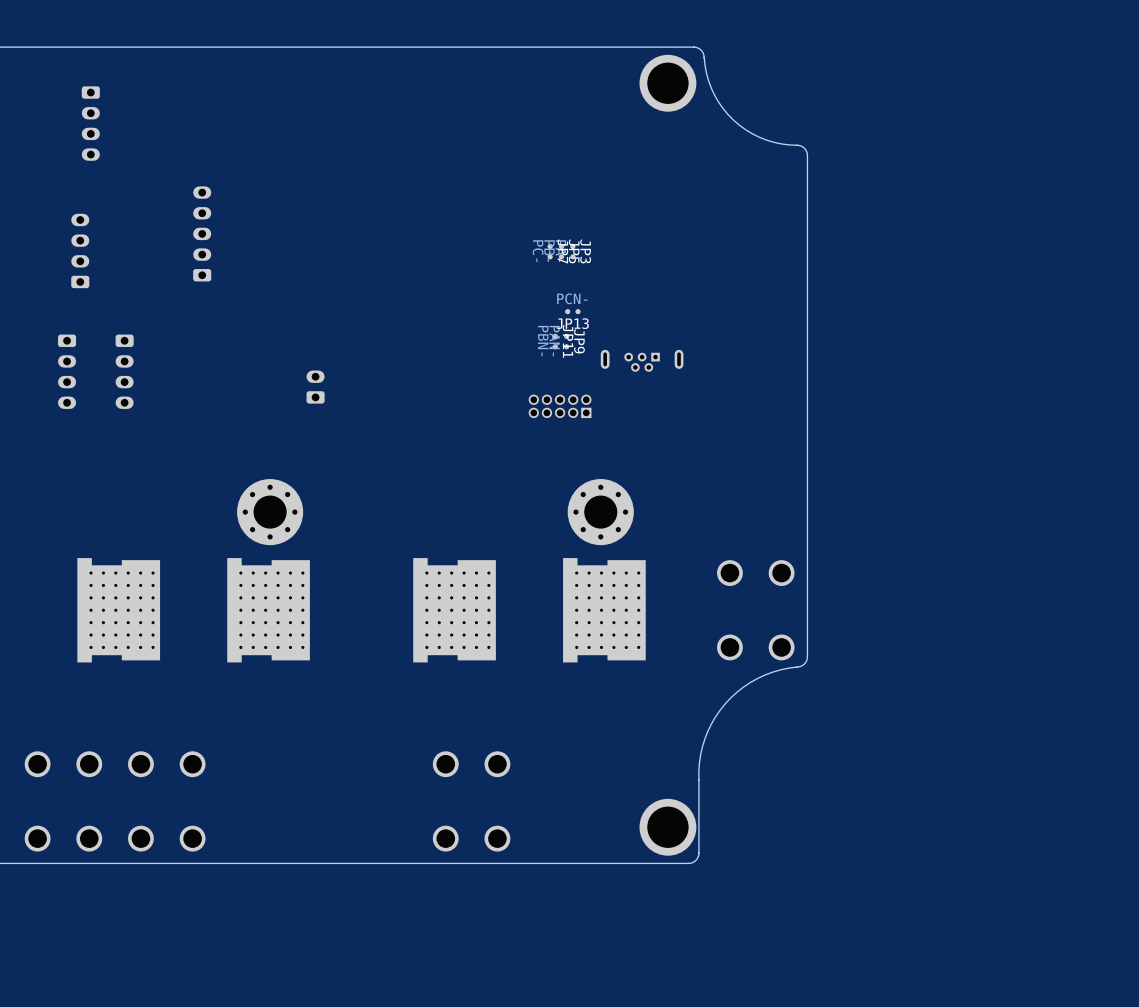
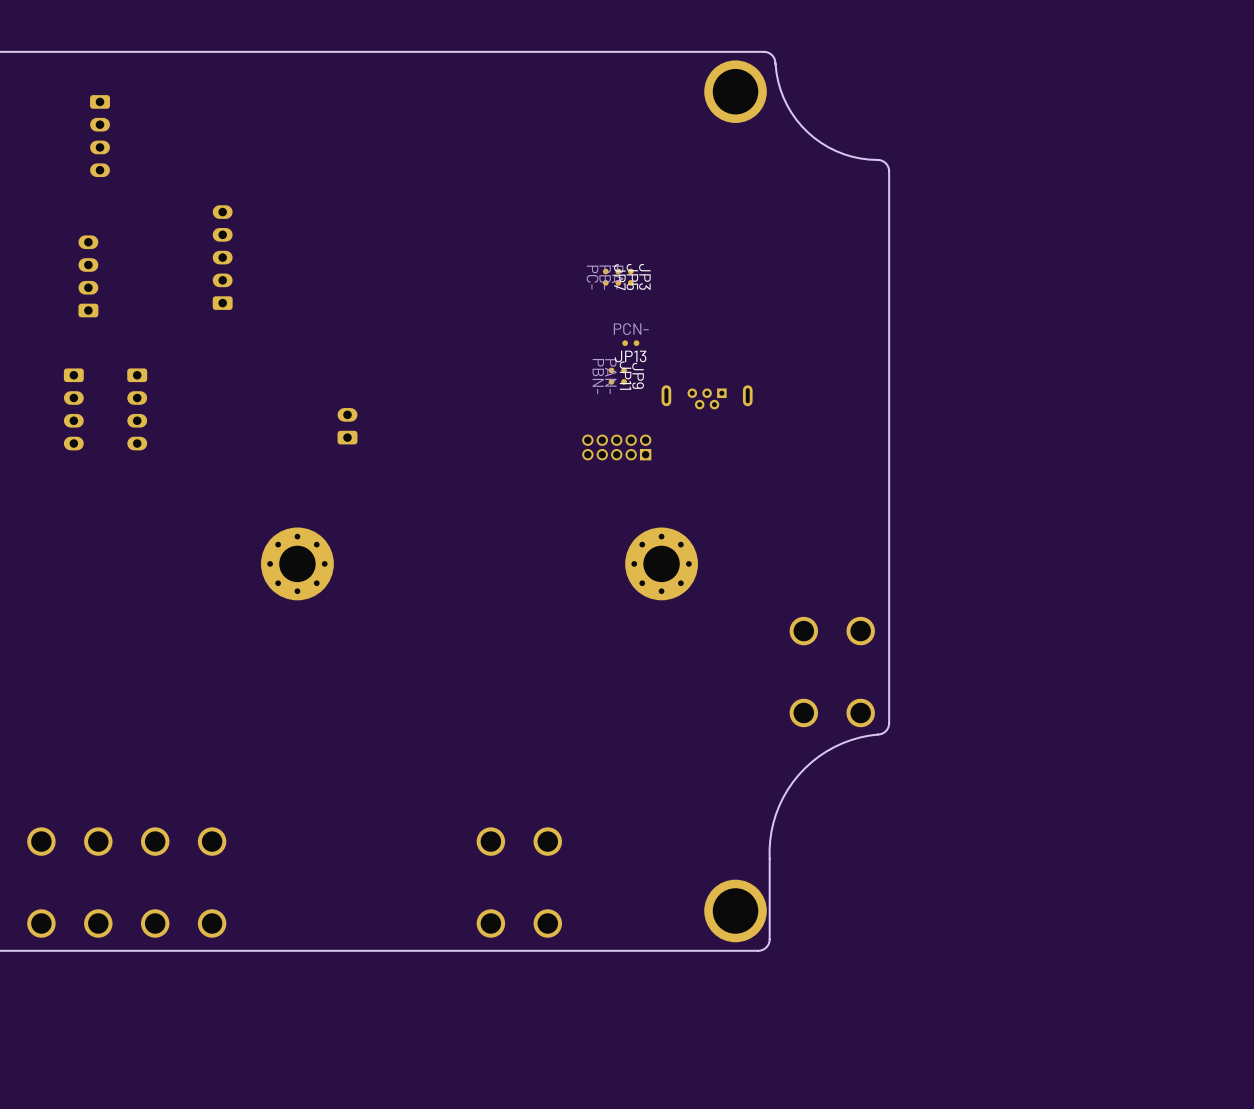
part: (118, 610) -> none
part: (268, 610) -> none
part: (454, 610) -> none
part: (604, 610) -> none

